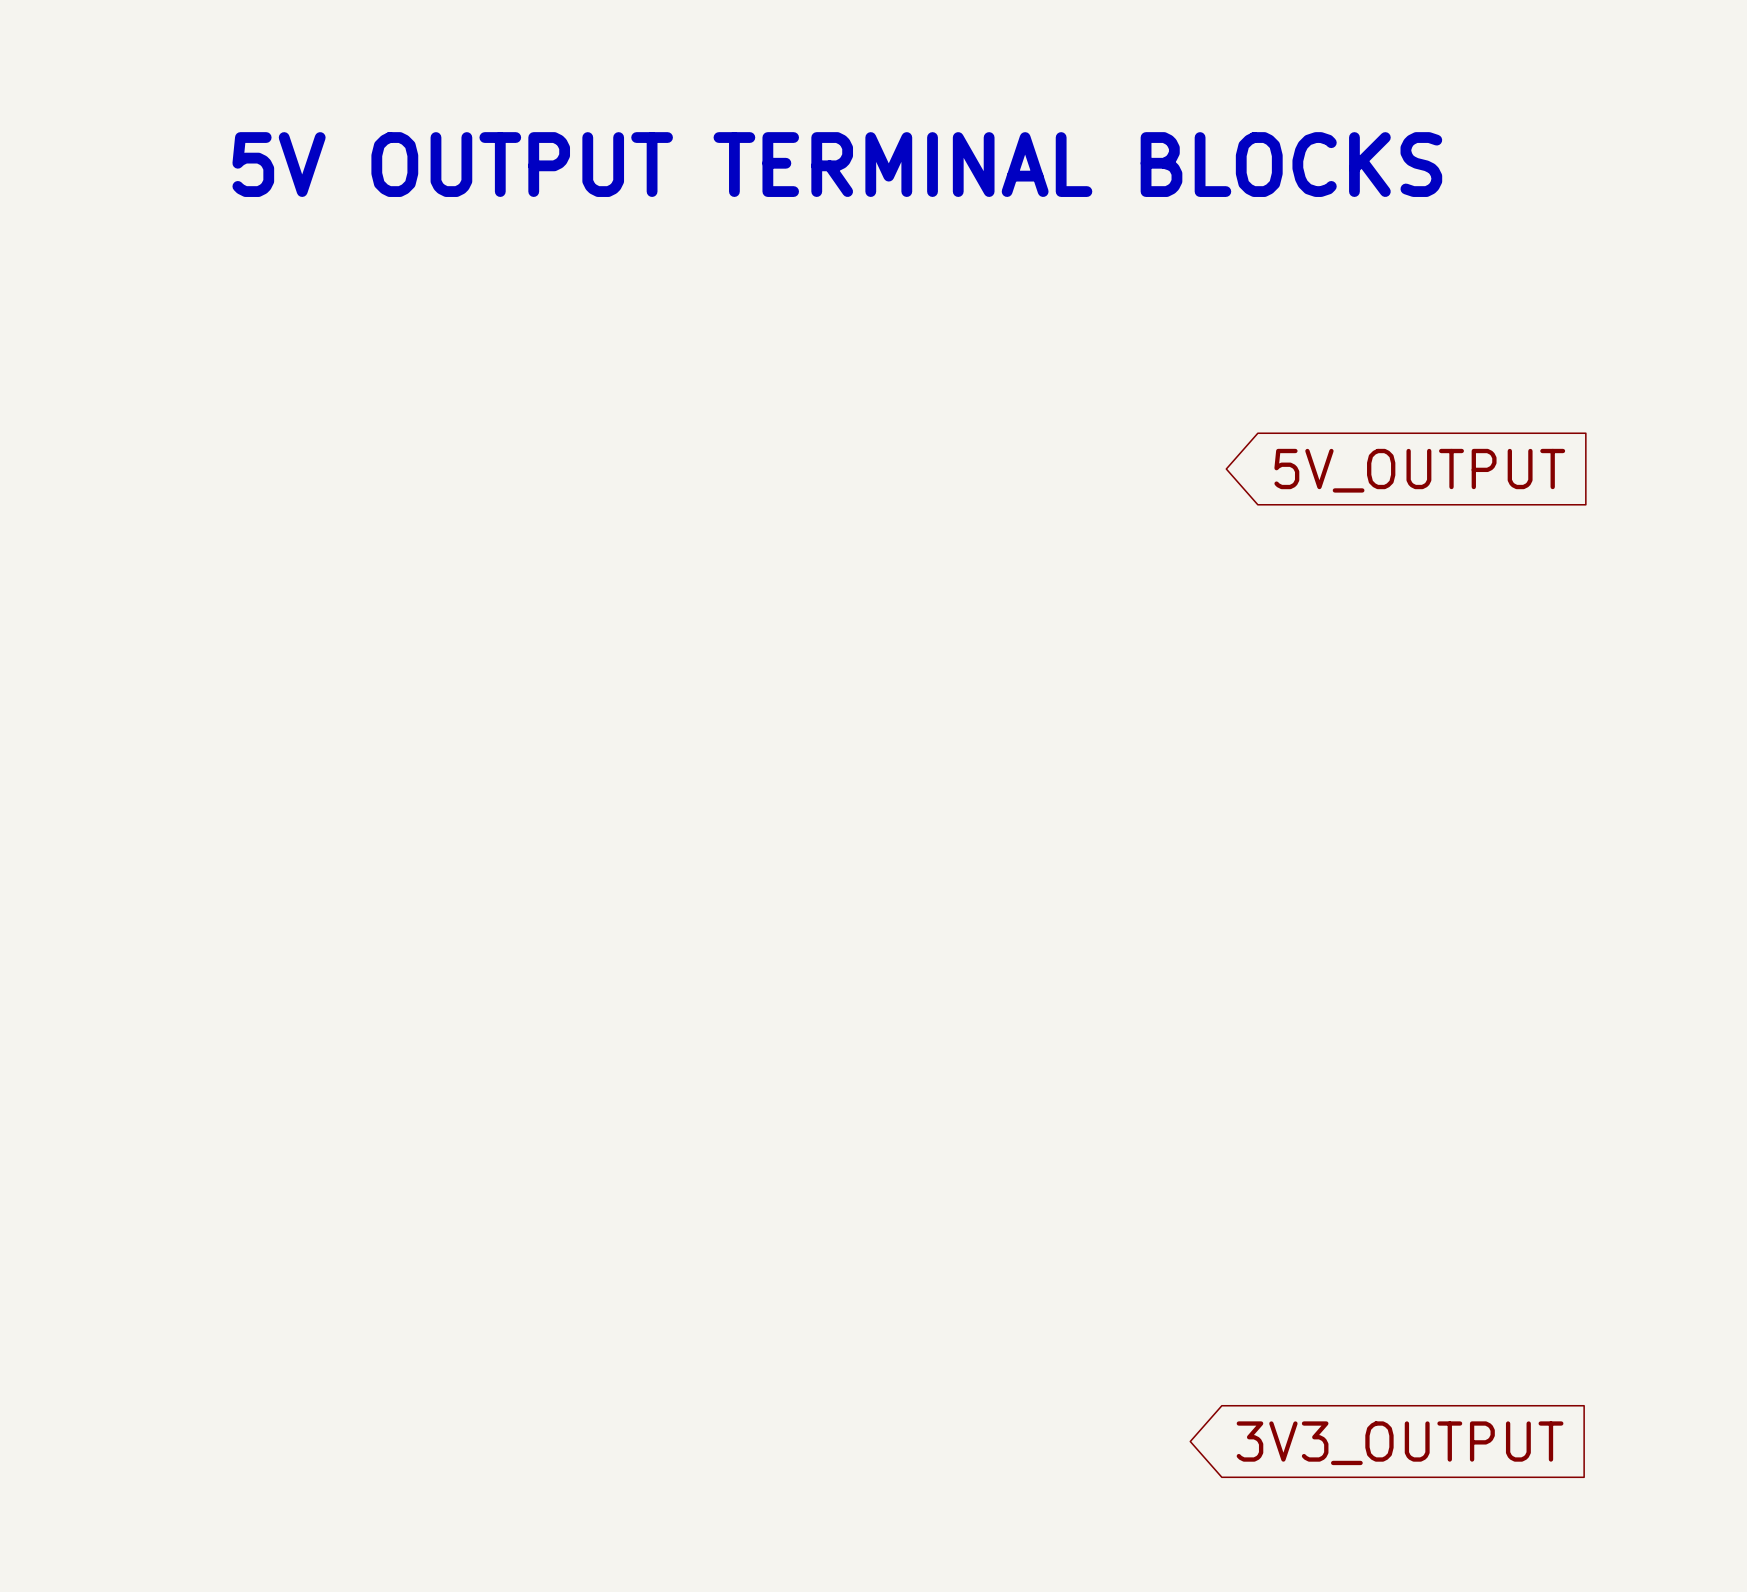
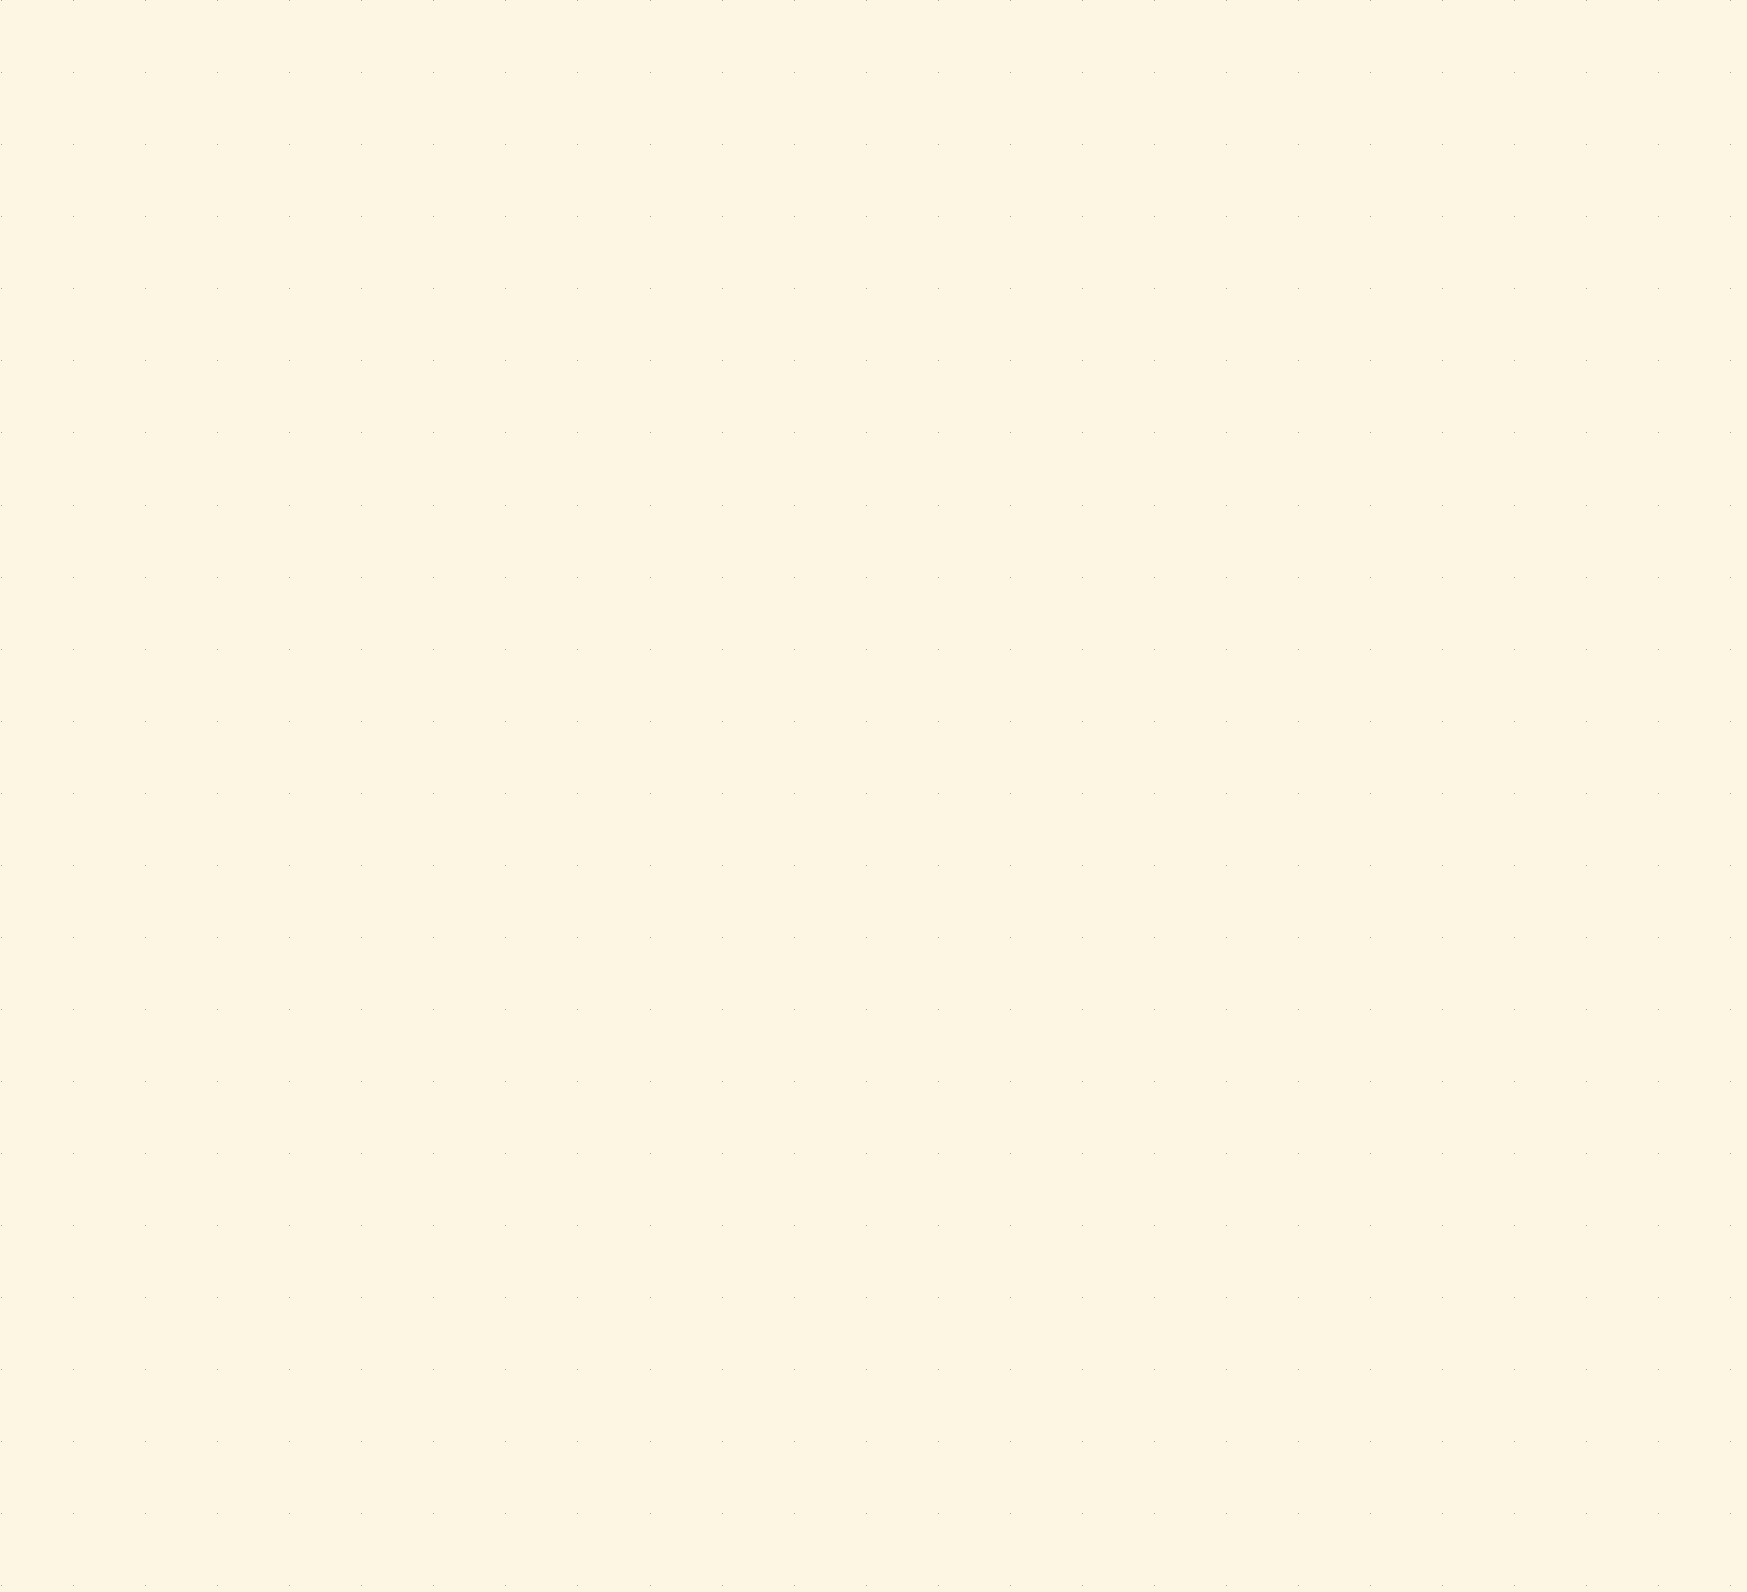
text: 5V OUTPUT TERMINAL BLOCKS (837, 164) -> none
global label: 5V_OUTPUT (1419, 470) -> none
global label: 3V3_OUTPUT (1400, 1443) -> none

